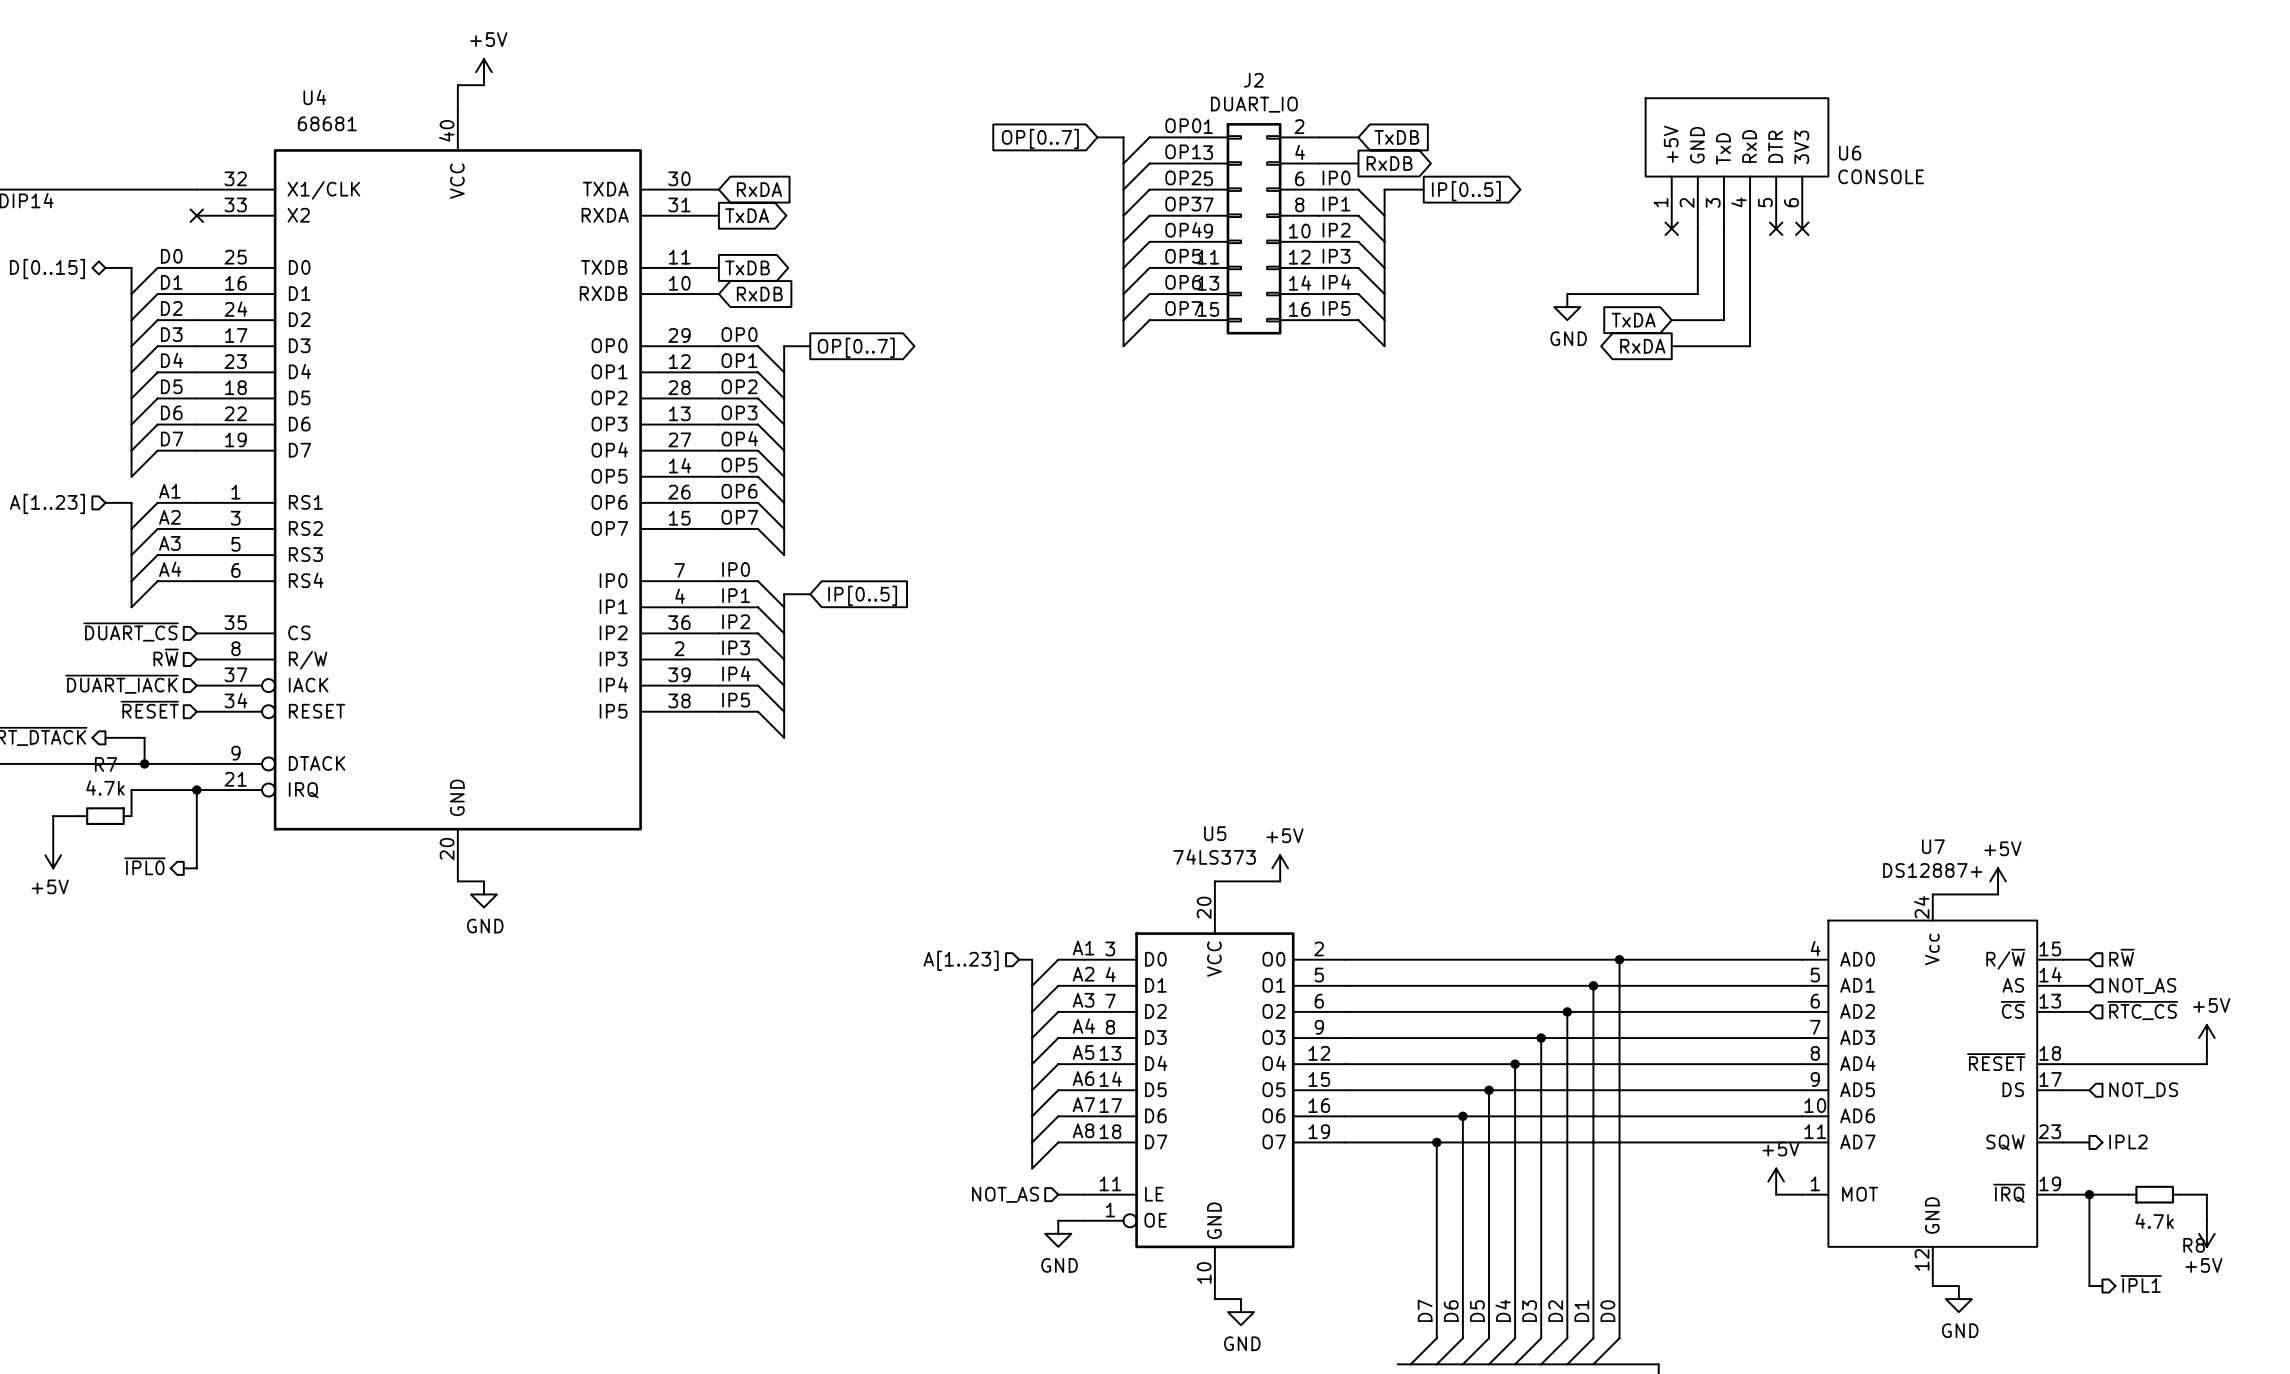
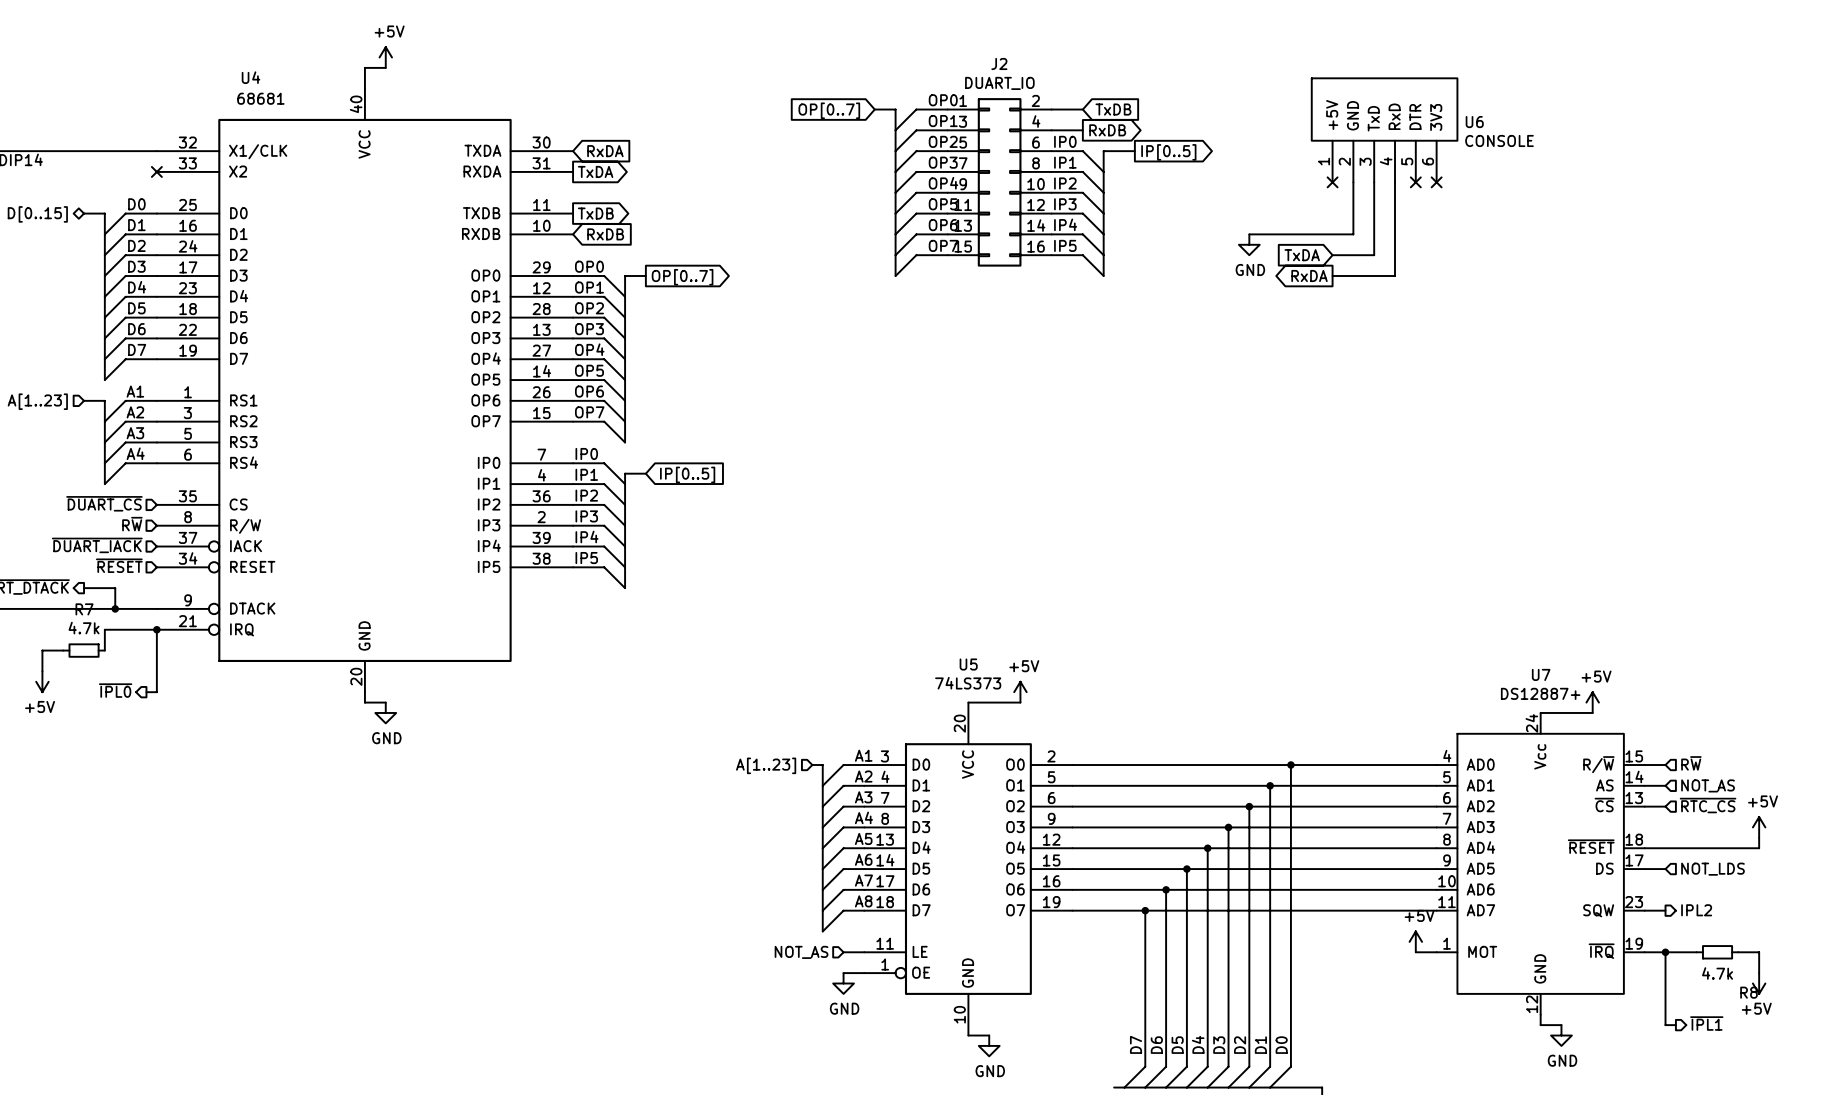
hierarchical label: NOT_DS (2143, 1090) -> NOT_LDS (1712, 869)

